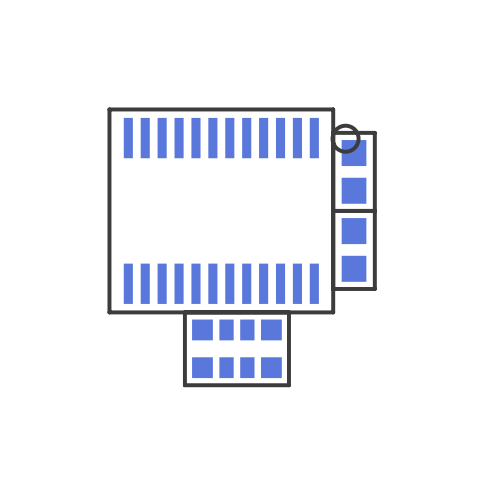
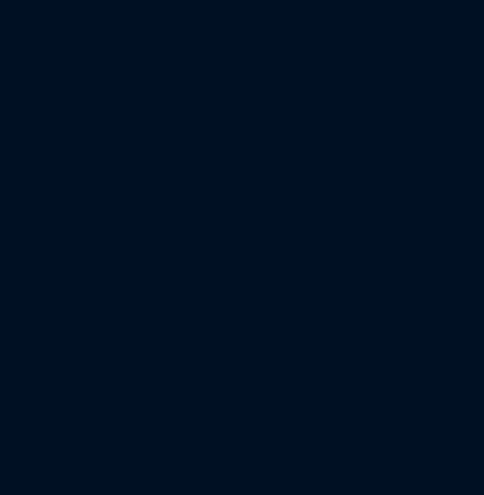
part: (354, 171) -> none
part: (234, 210) -> none
part: (354, 249) -> none
part: (236, 348) -> none

